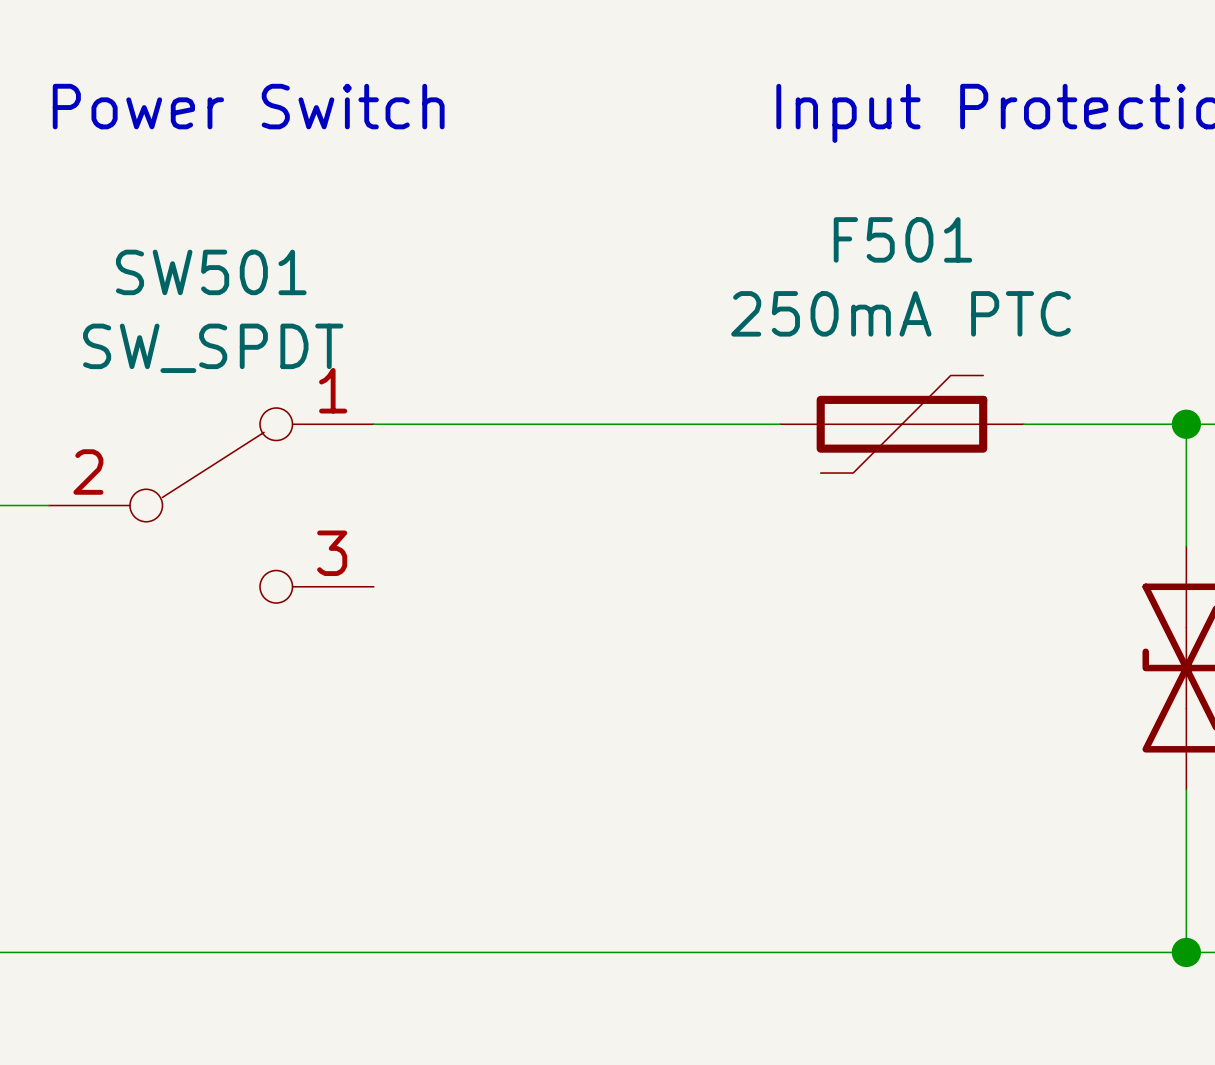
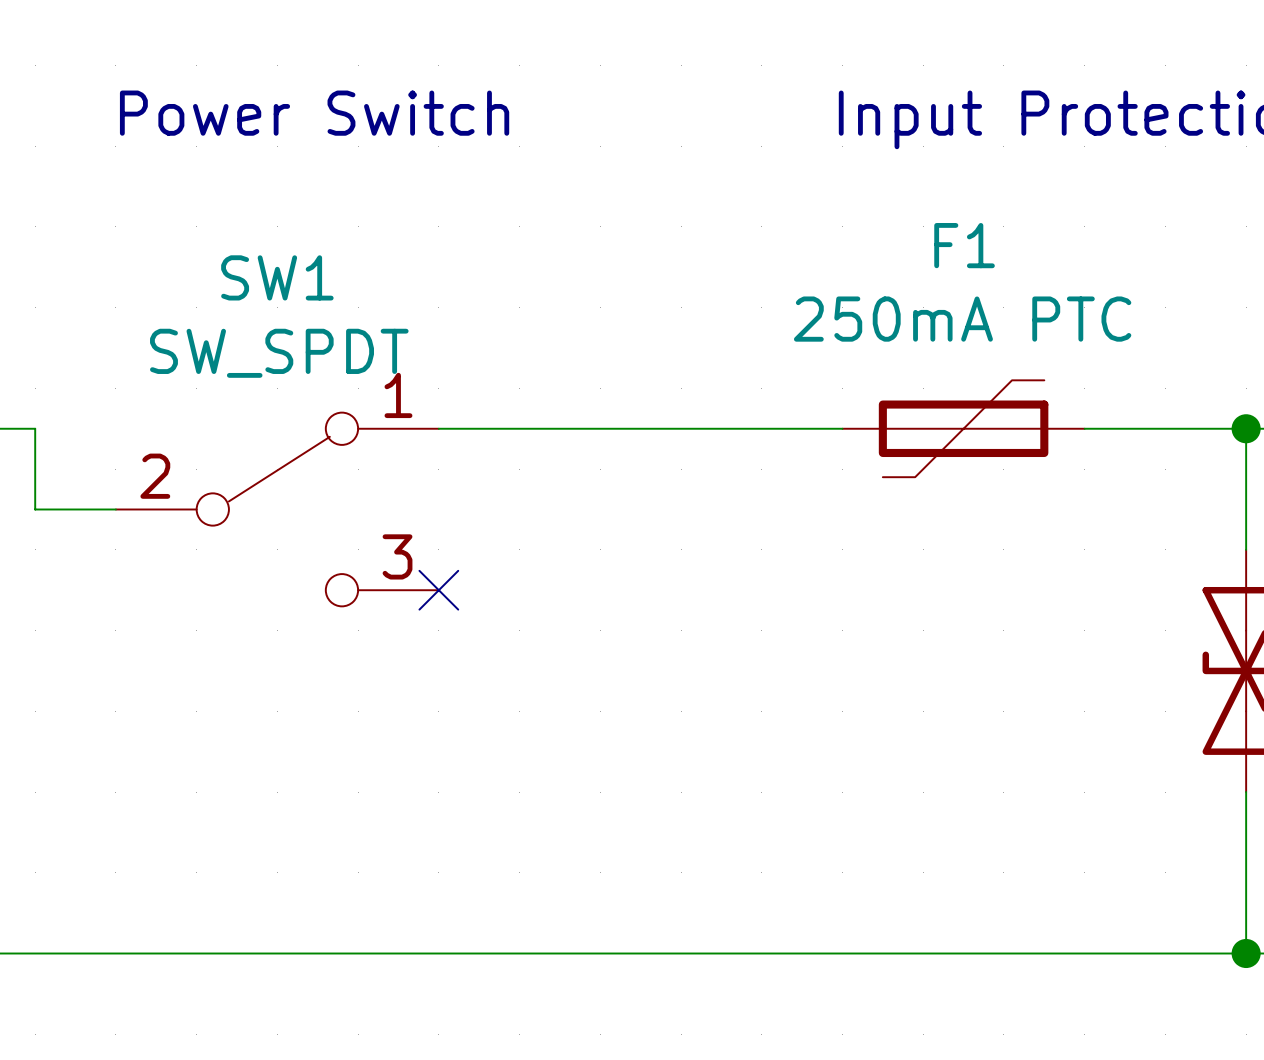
F501 name: F501 (902, 239) -> F1 (964, 245)
SW501 name: SW501 (211, 272) -> SW1 (277, 277)
no-connect mark: none -> (438, 590)

